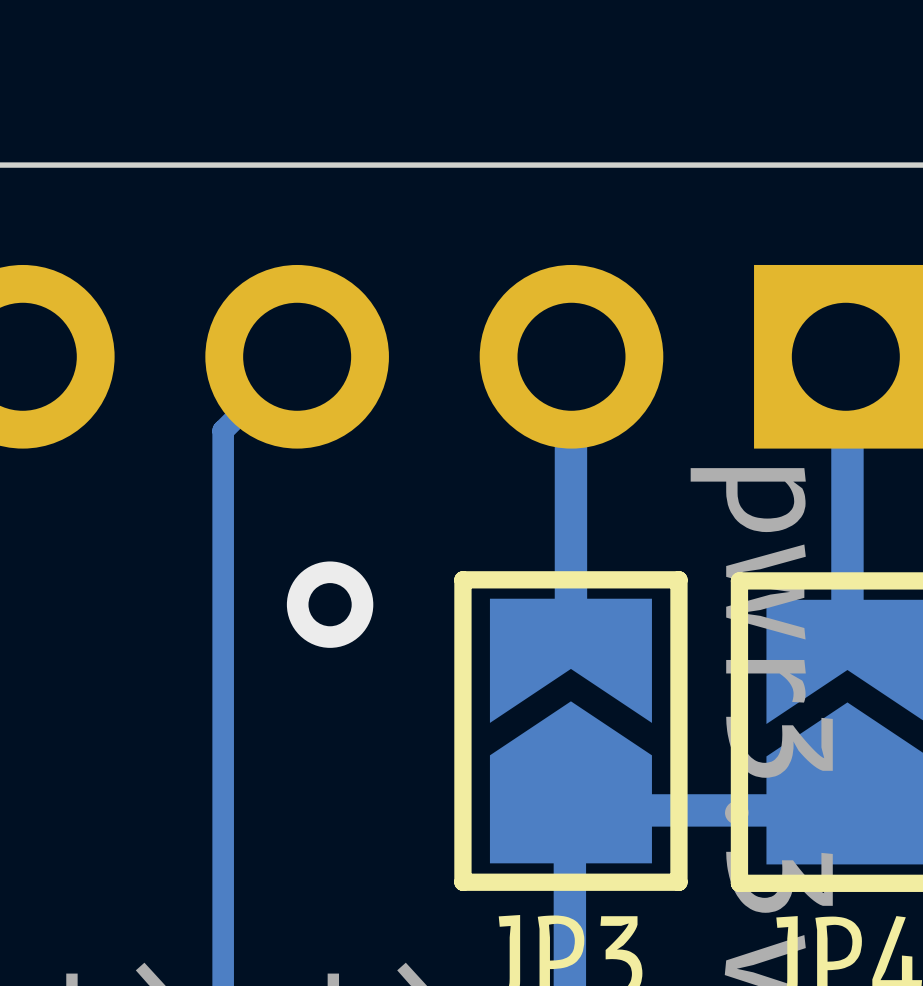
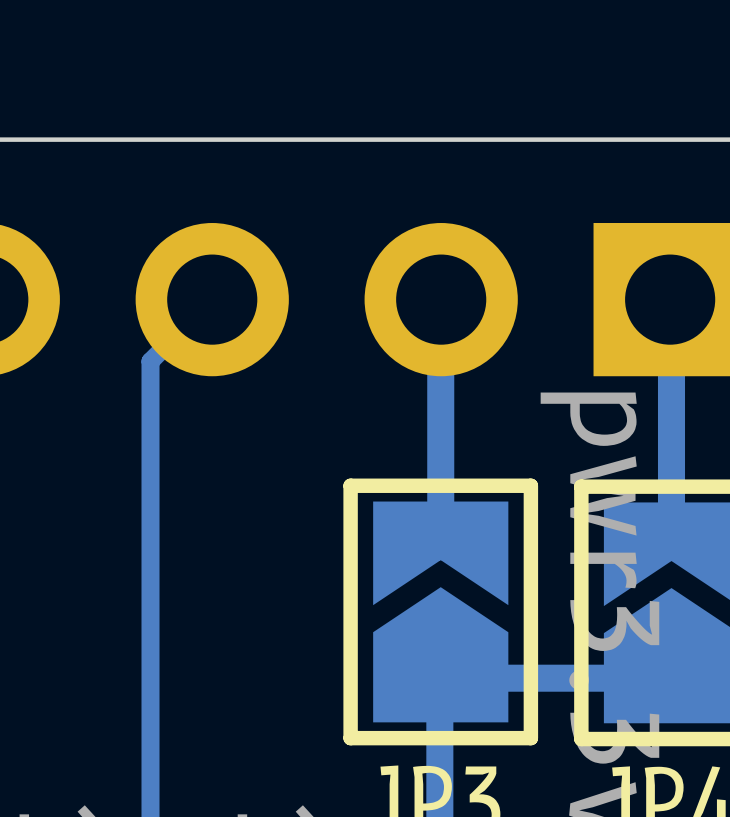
via: (330, 604) -> none

